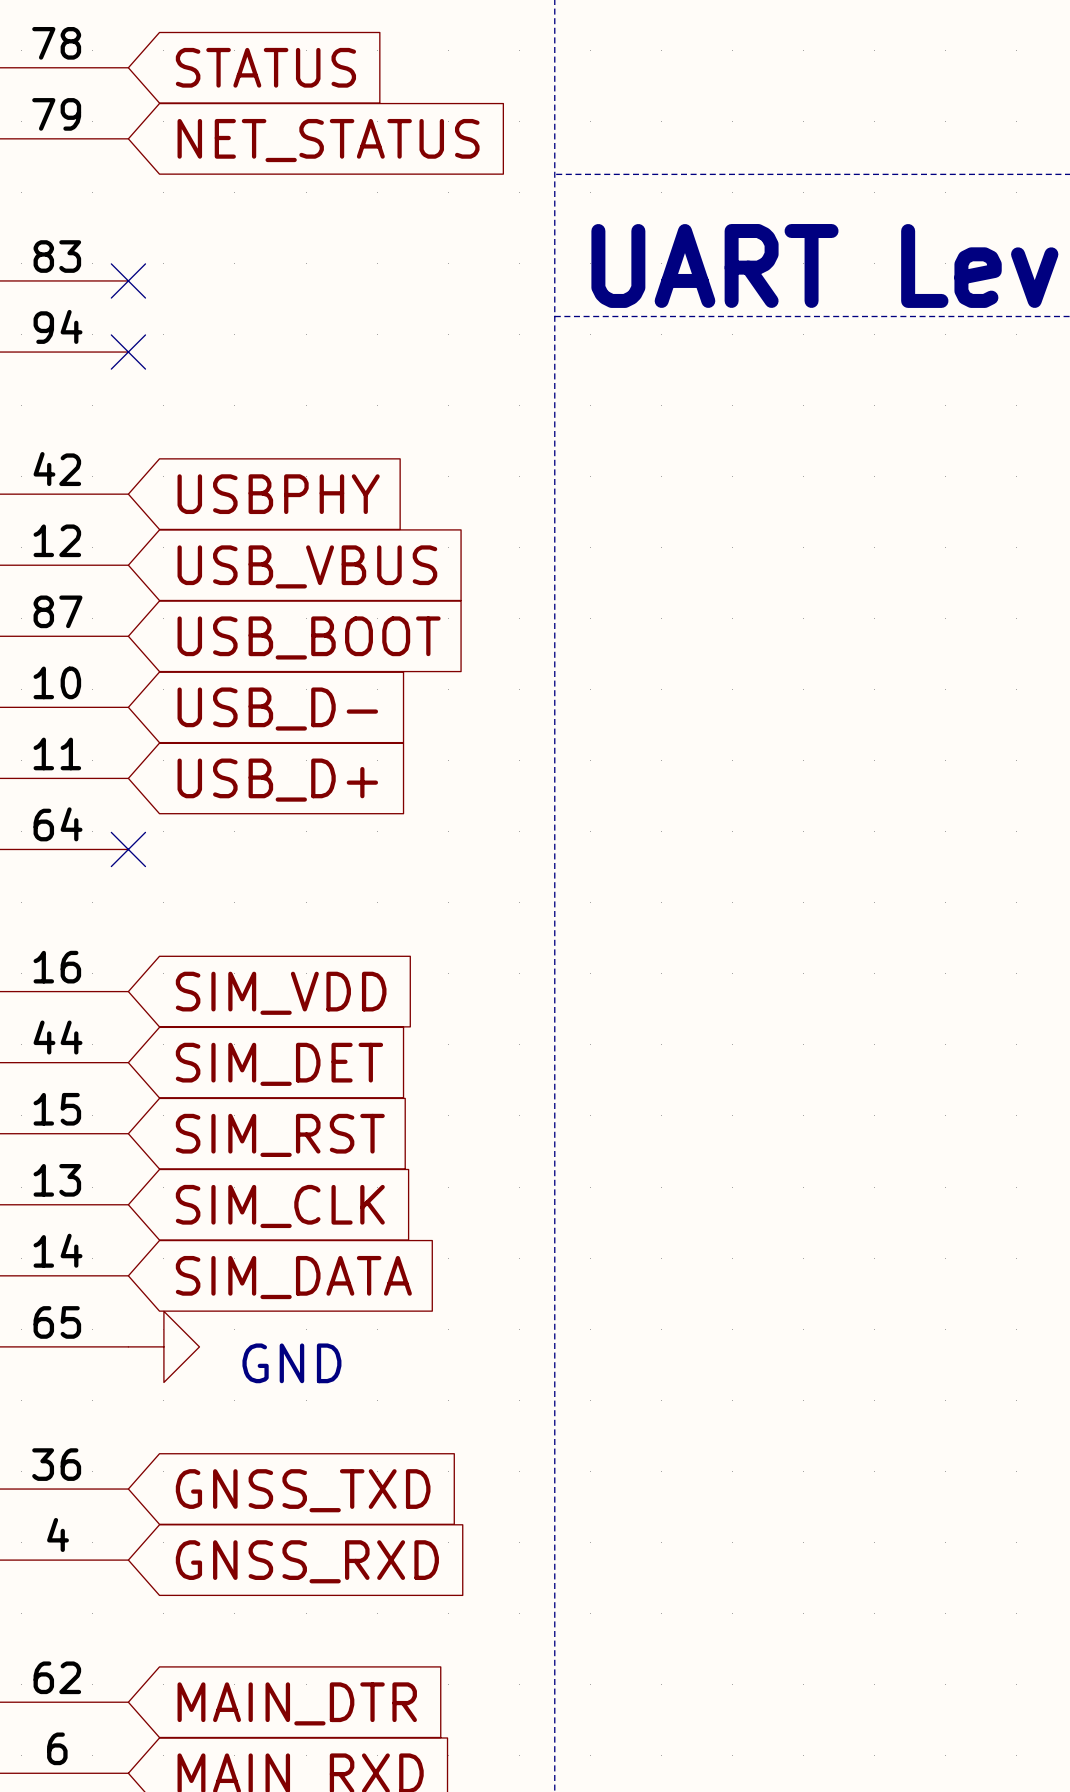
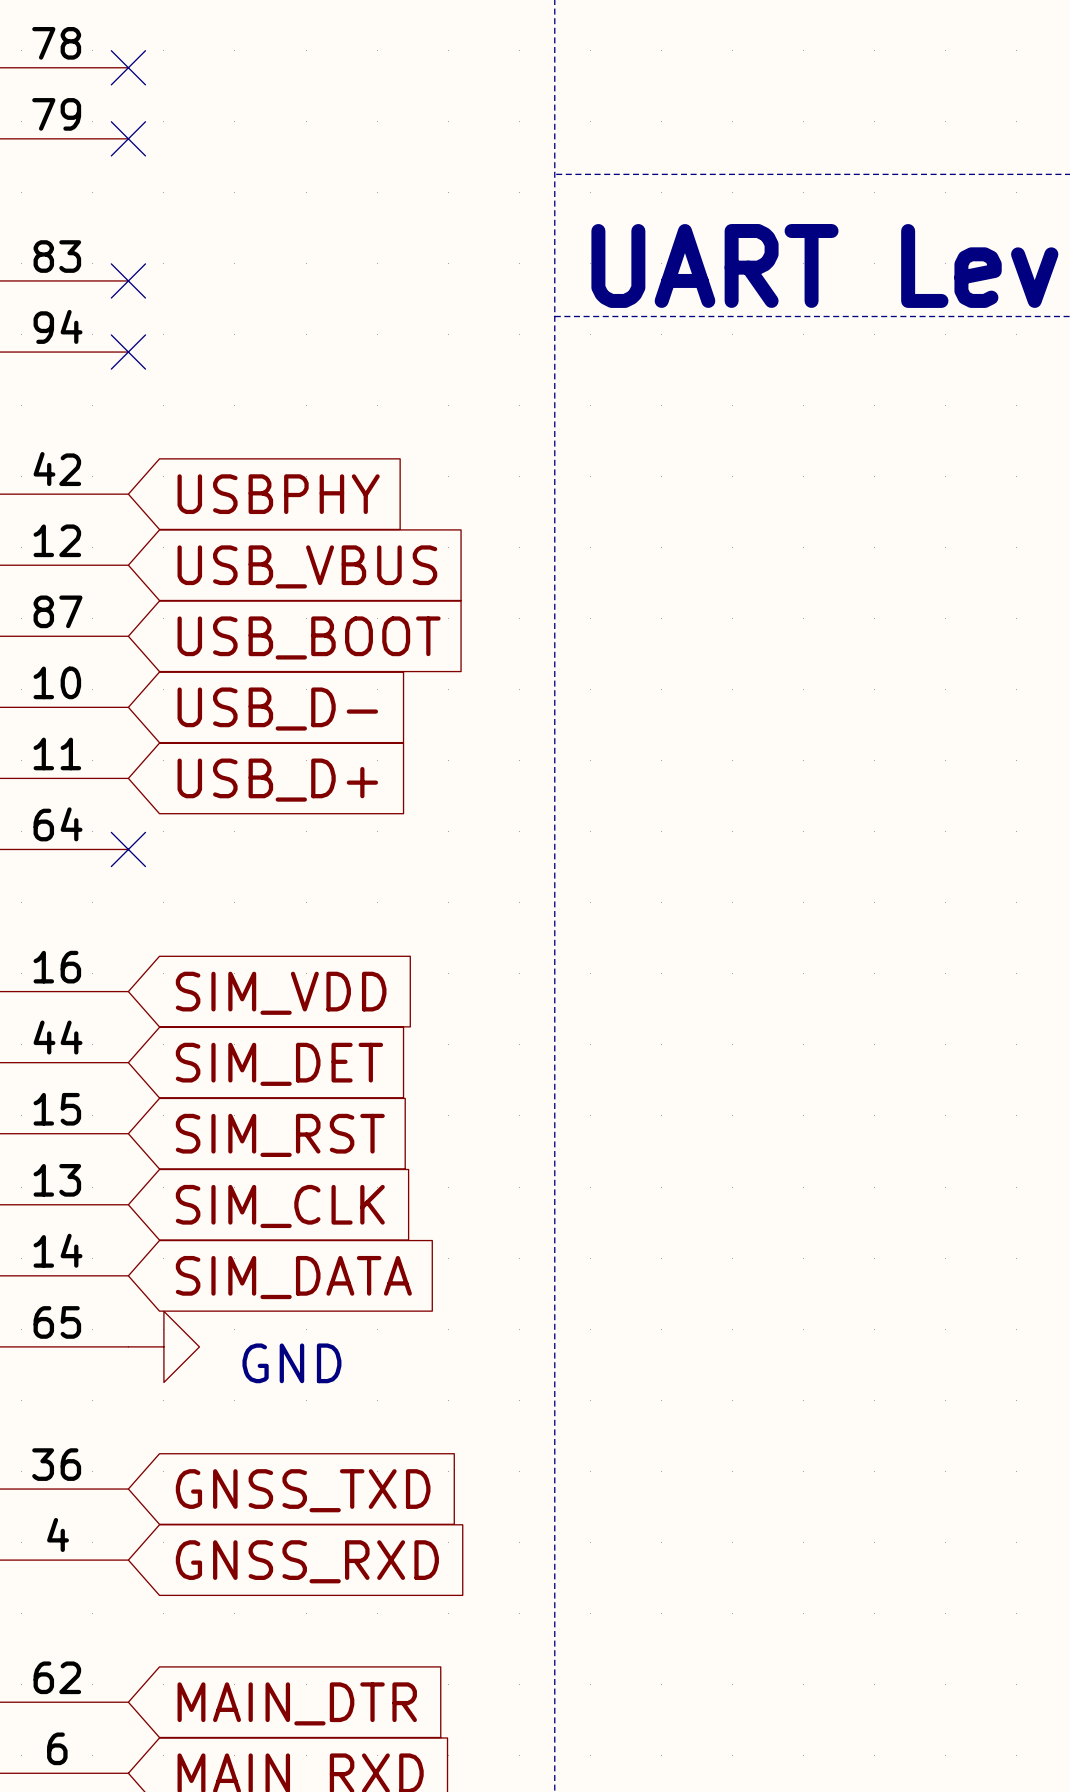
no-connect mark: none -> (128, 67)
global label: STATUS (265, 67) -> none
no-connect mark: none -> (128, 138)
global label: NET_STATUS (328, 140) -> none

